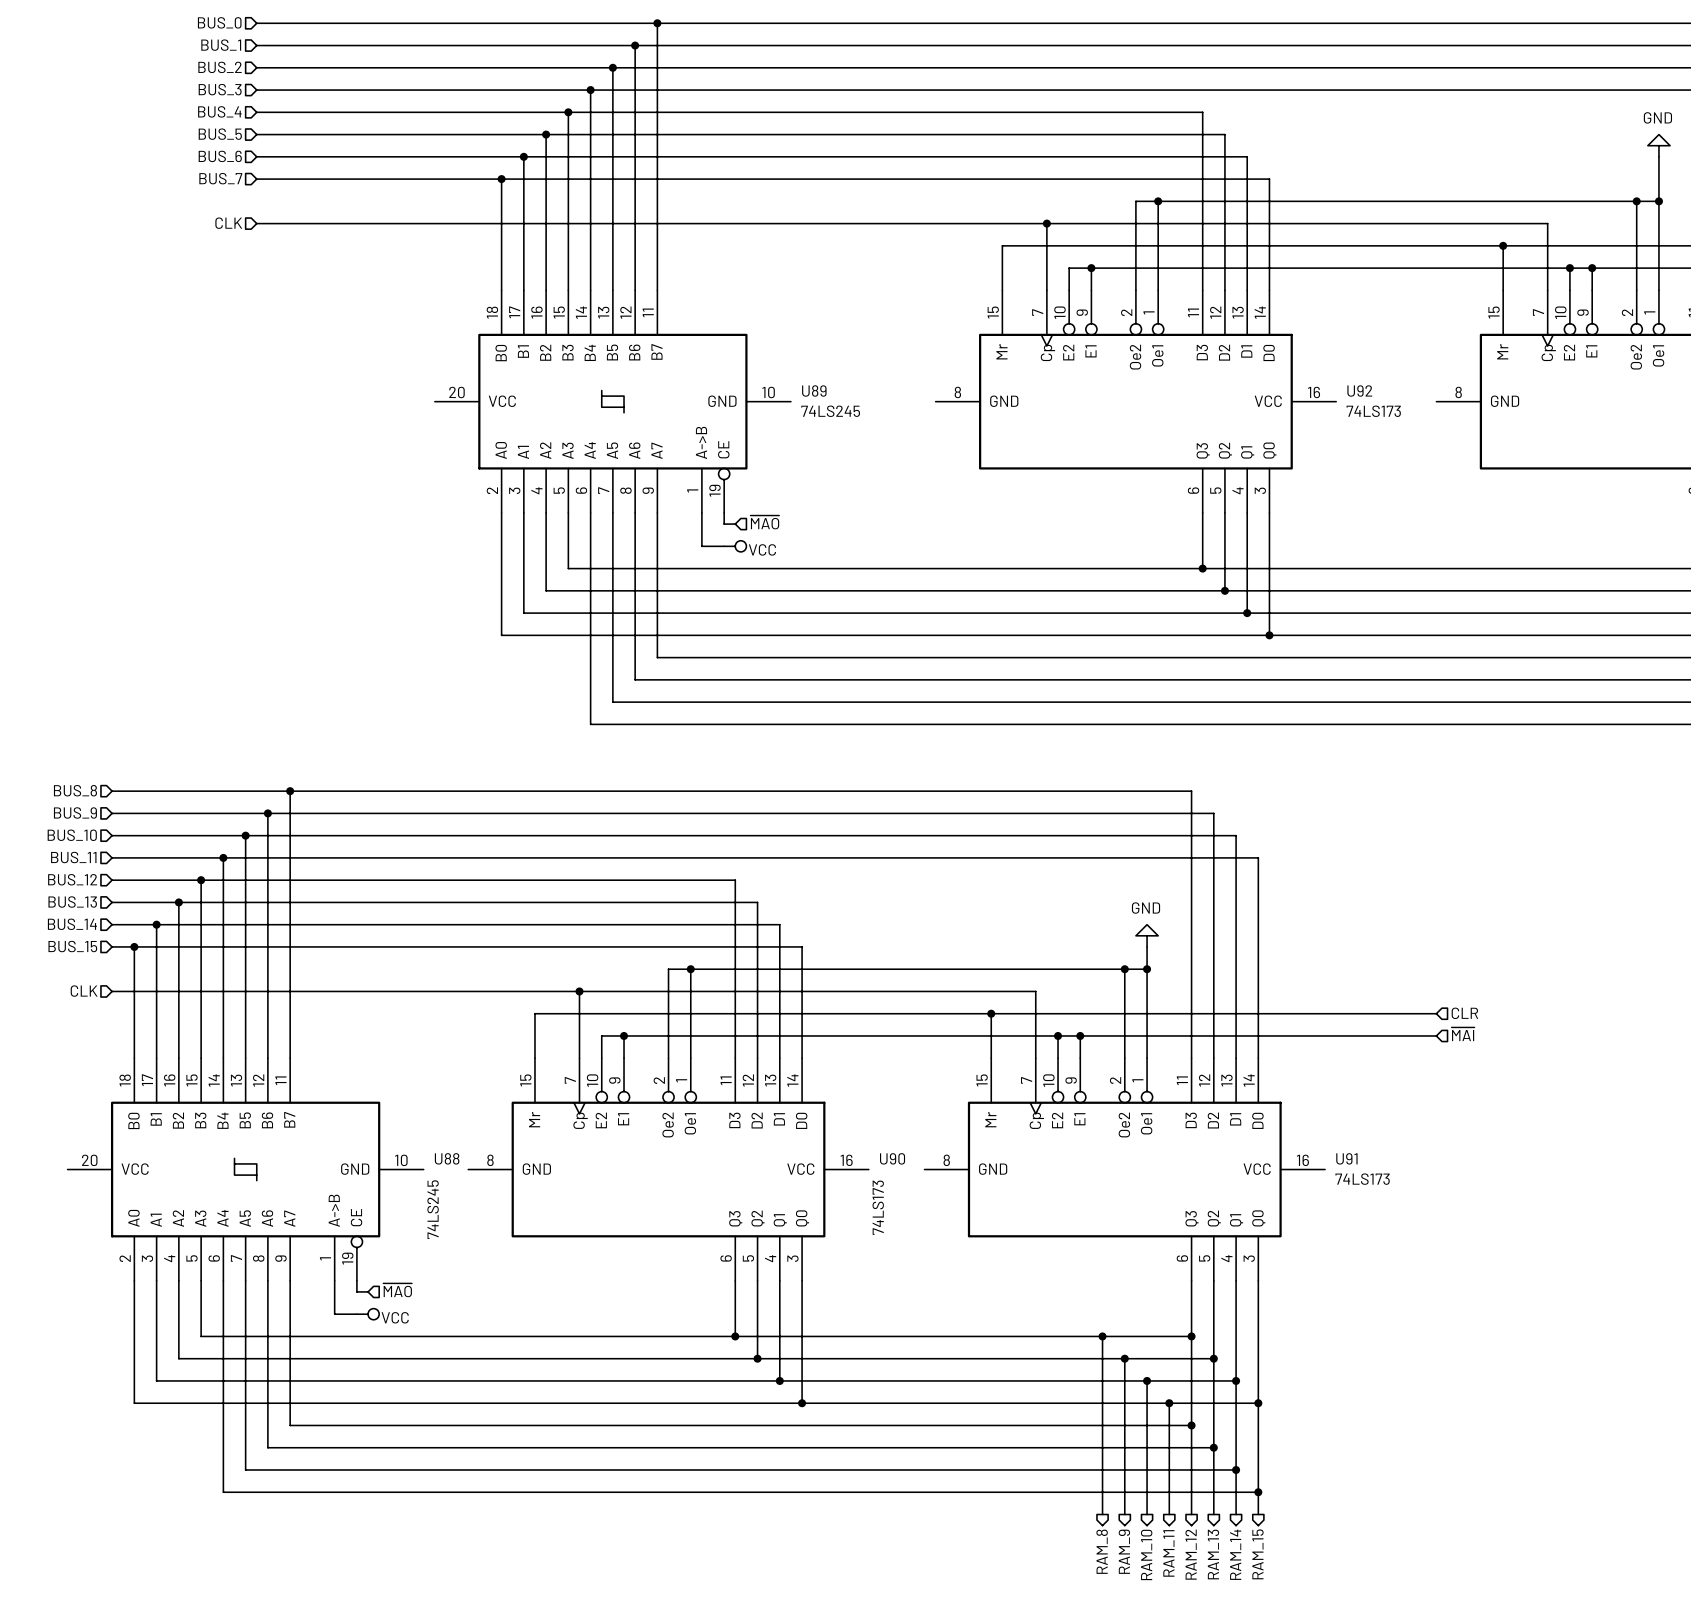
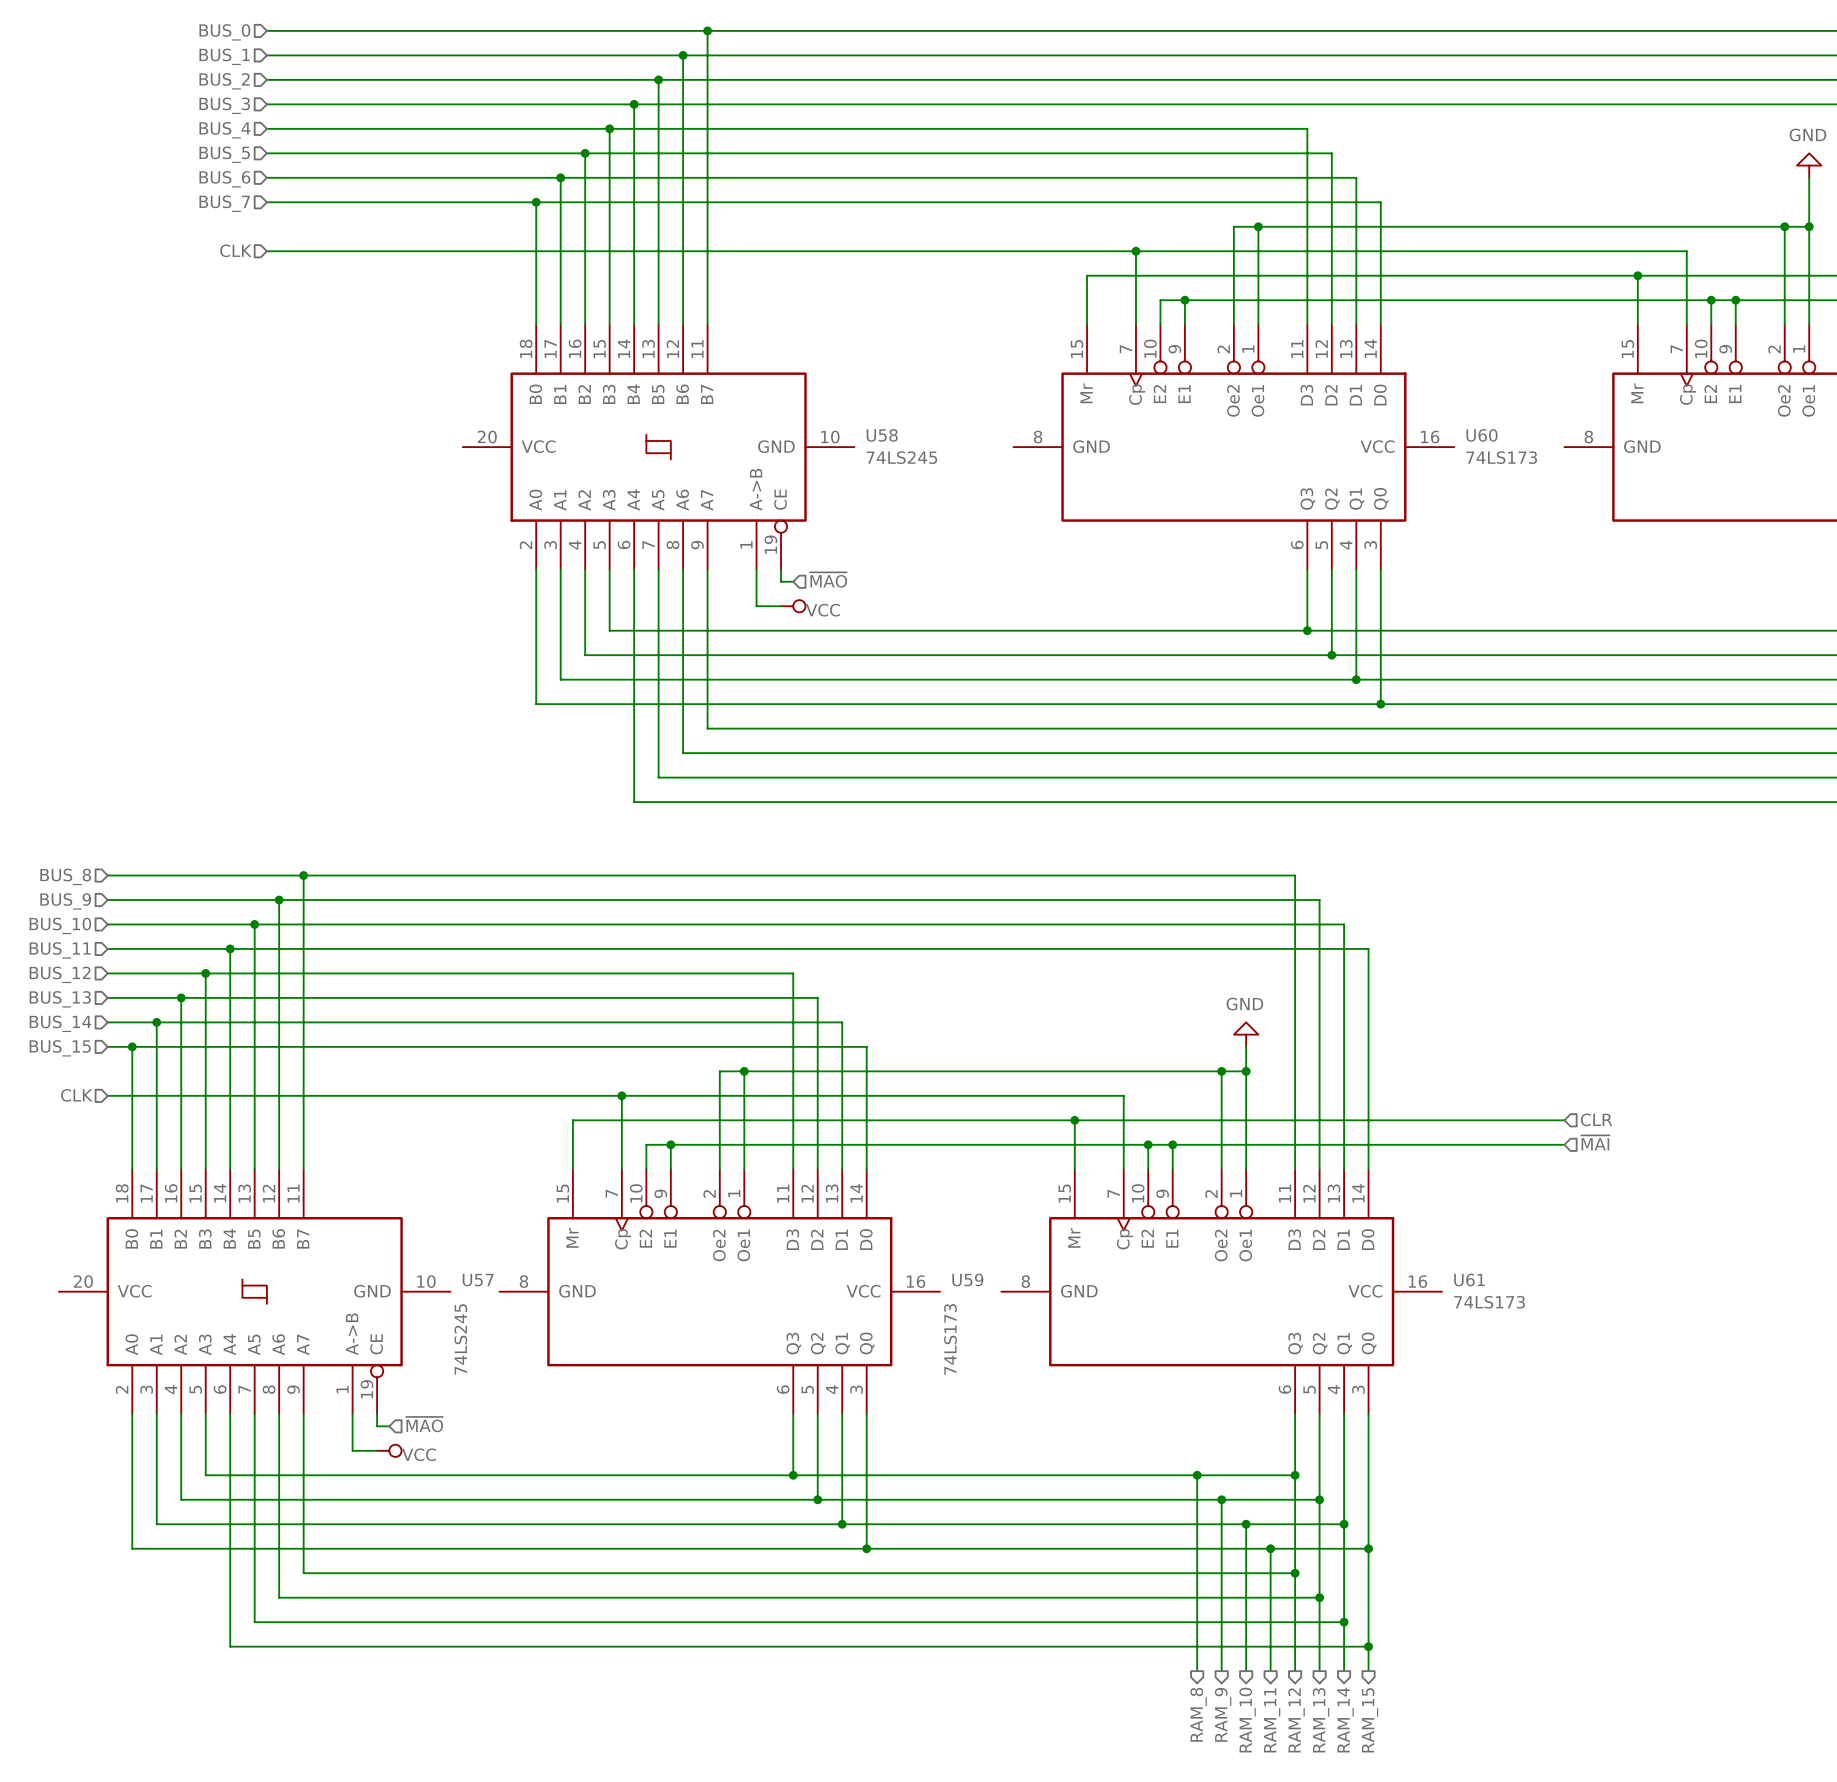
U89 name: U89 (814, 390) -> U58 (882, 435)
U92 name: U92 (1359, 391) -> U60 (1482, 435)
U88 name: U88 (447, 1158) -> U57 (478, 1280)
U90 name: U90 (892, 1158) -> U59 (967, 1279)
U91 name: U91 (1346, 1158) -> U61 (1469, 1279)

